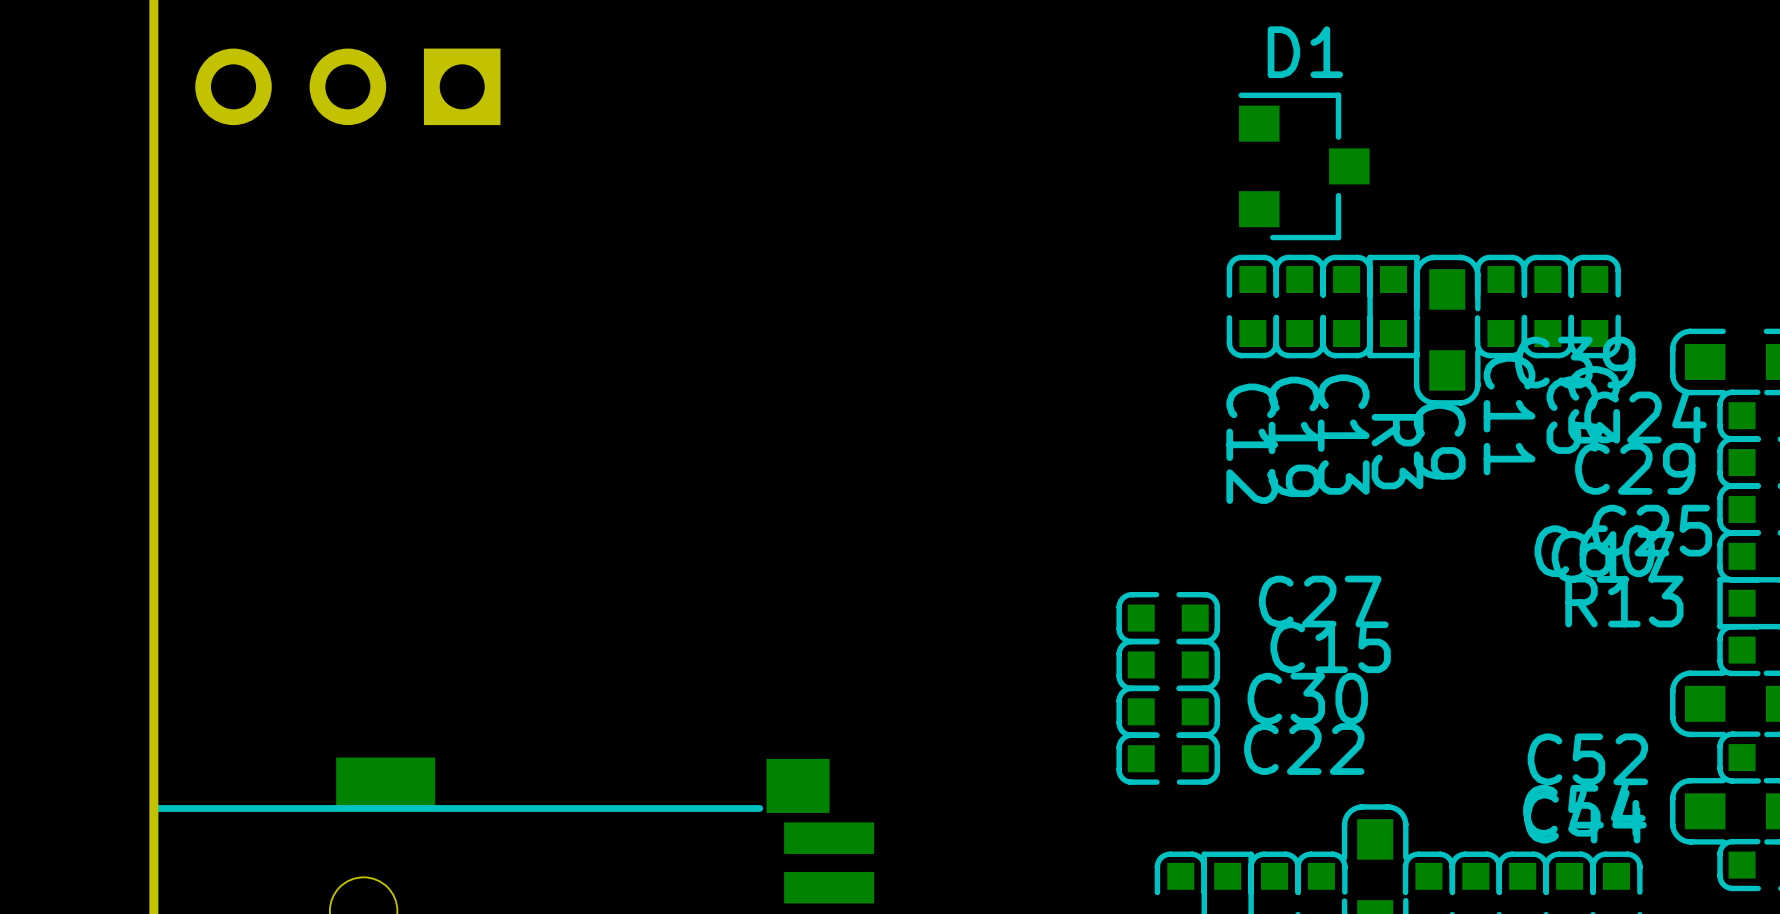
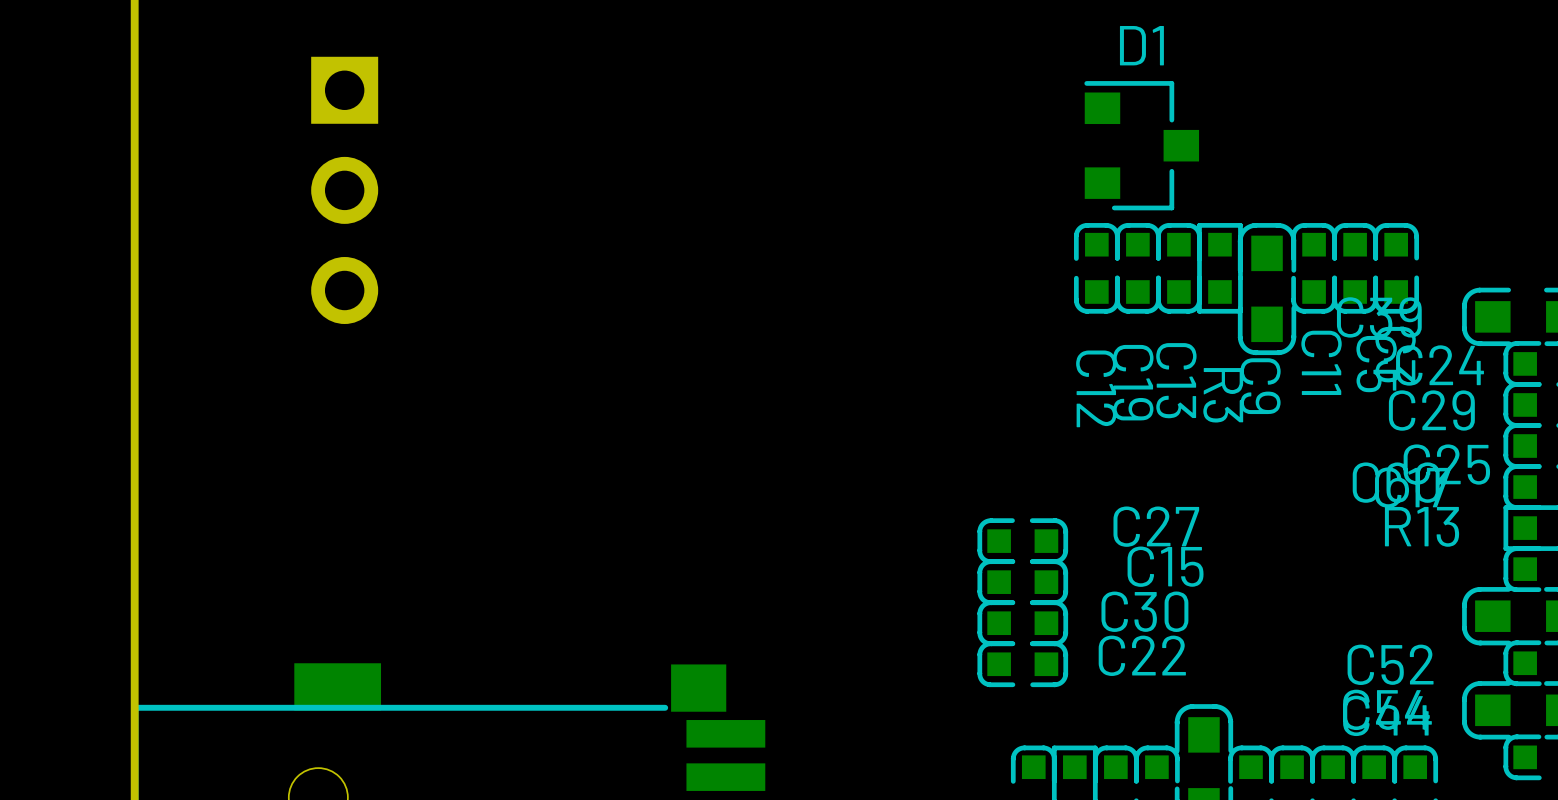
part rotation: 0° (347, 86) -> 90° counterclockwise (344, 190)

